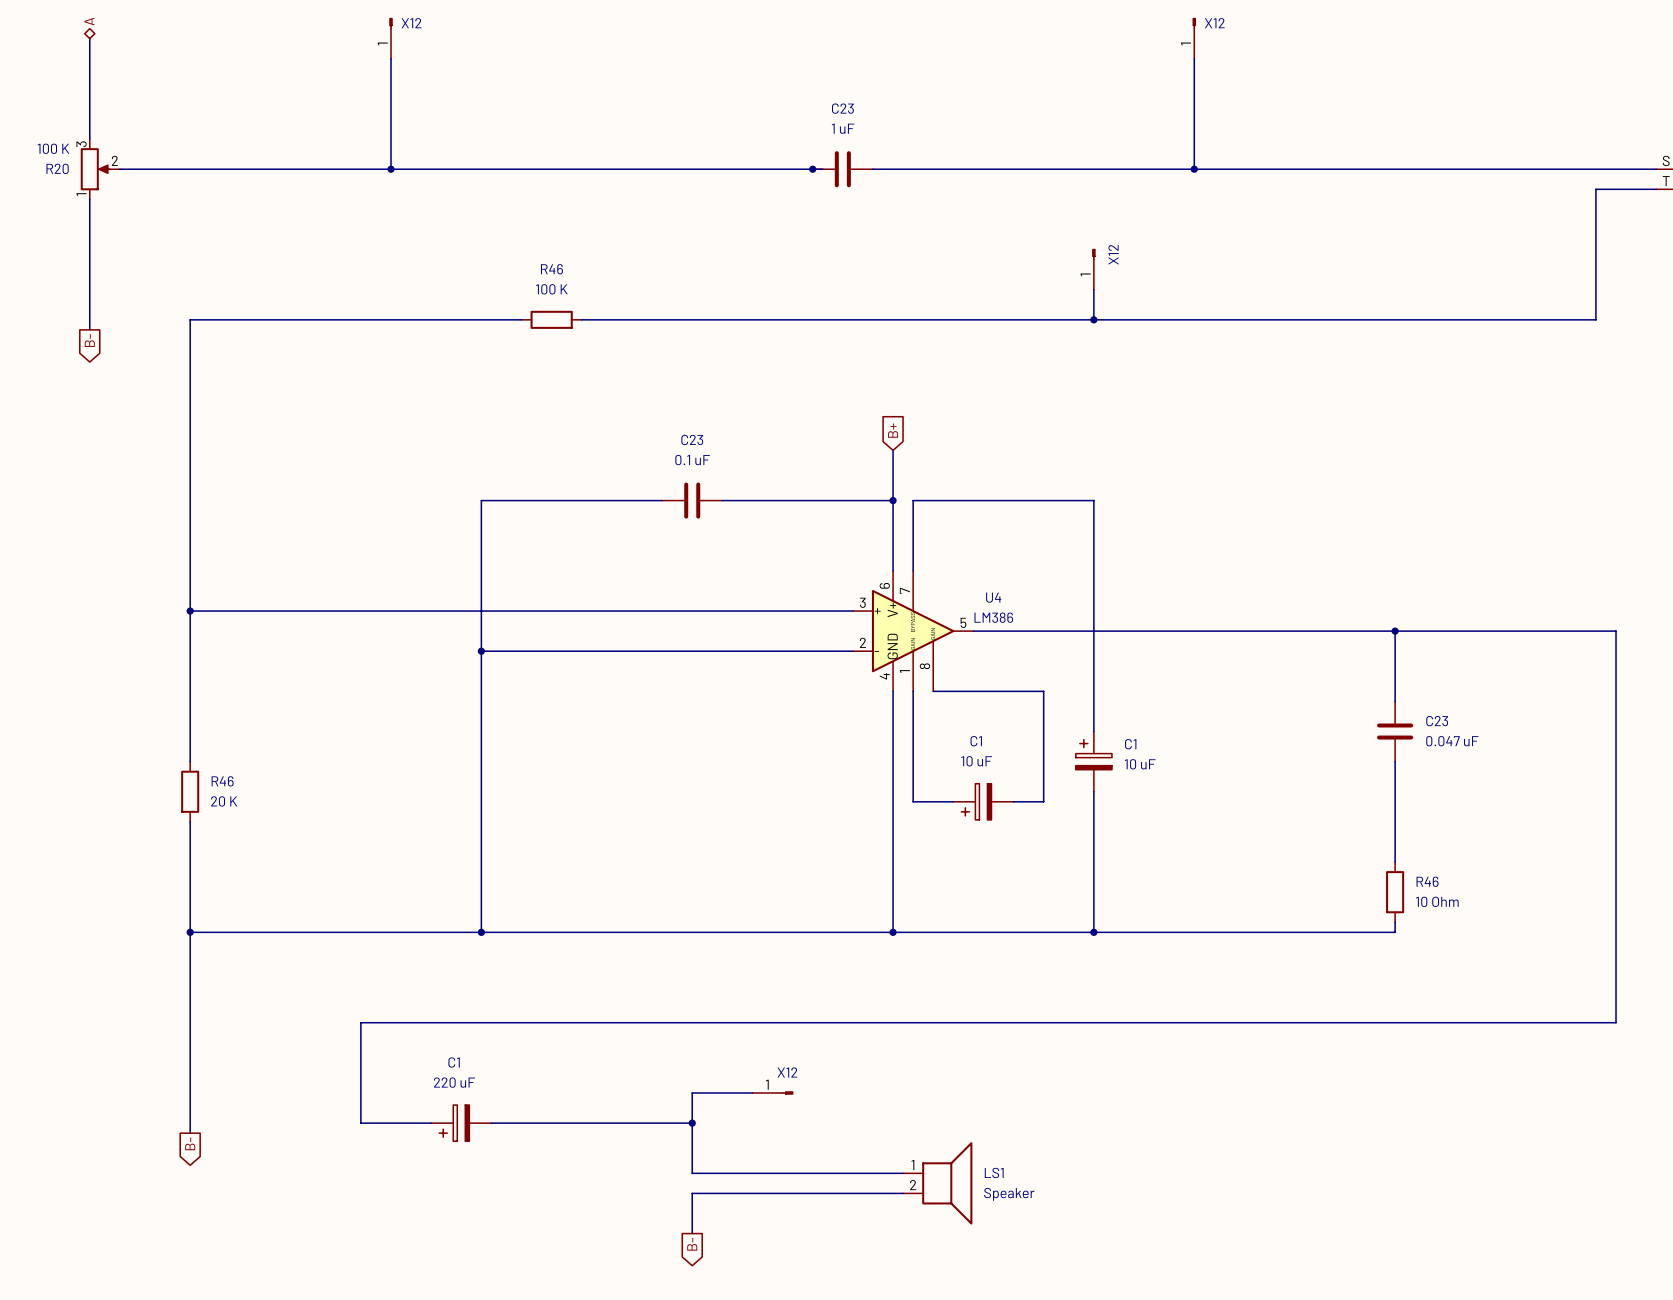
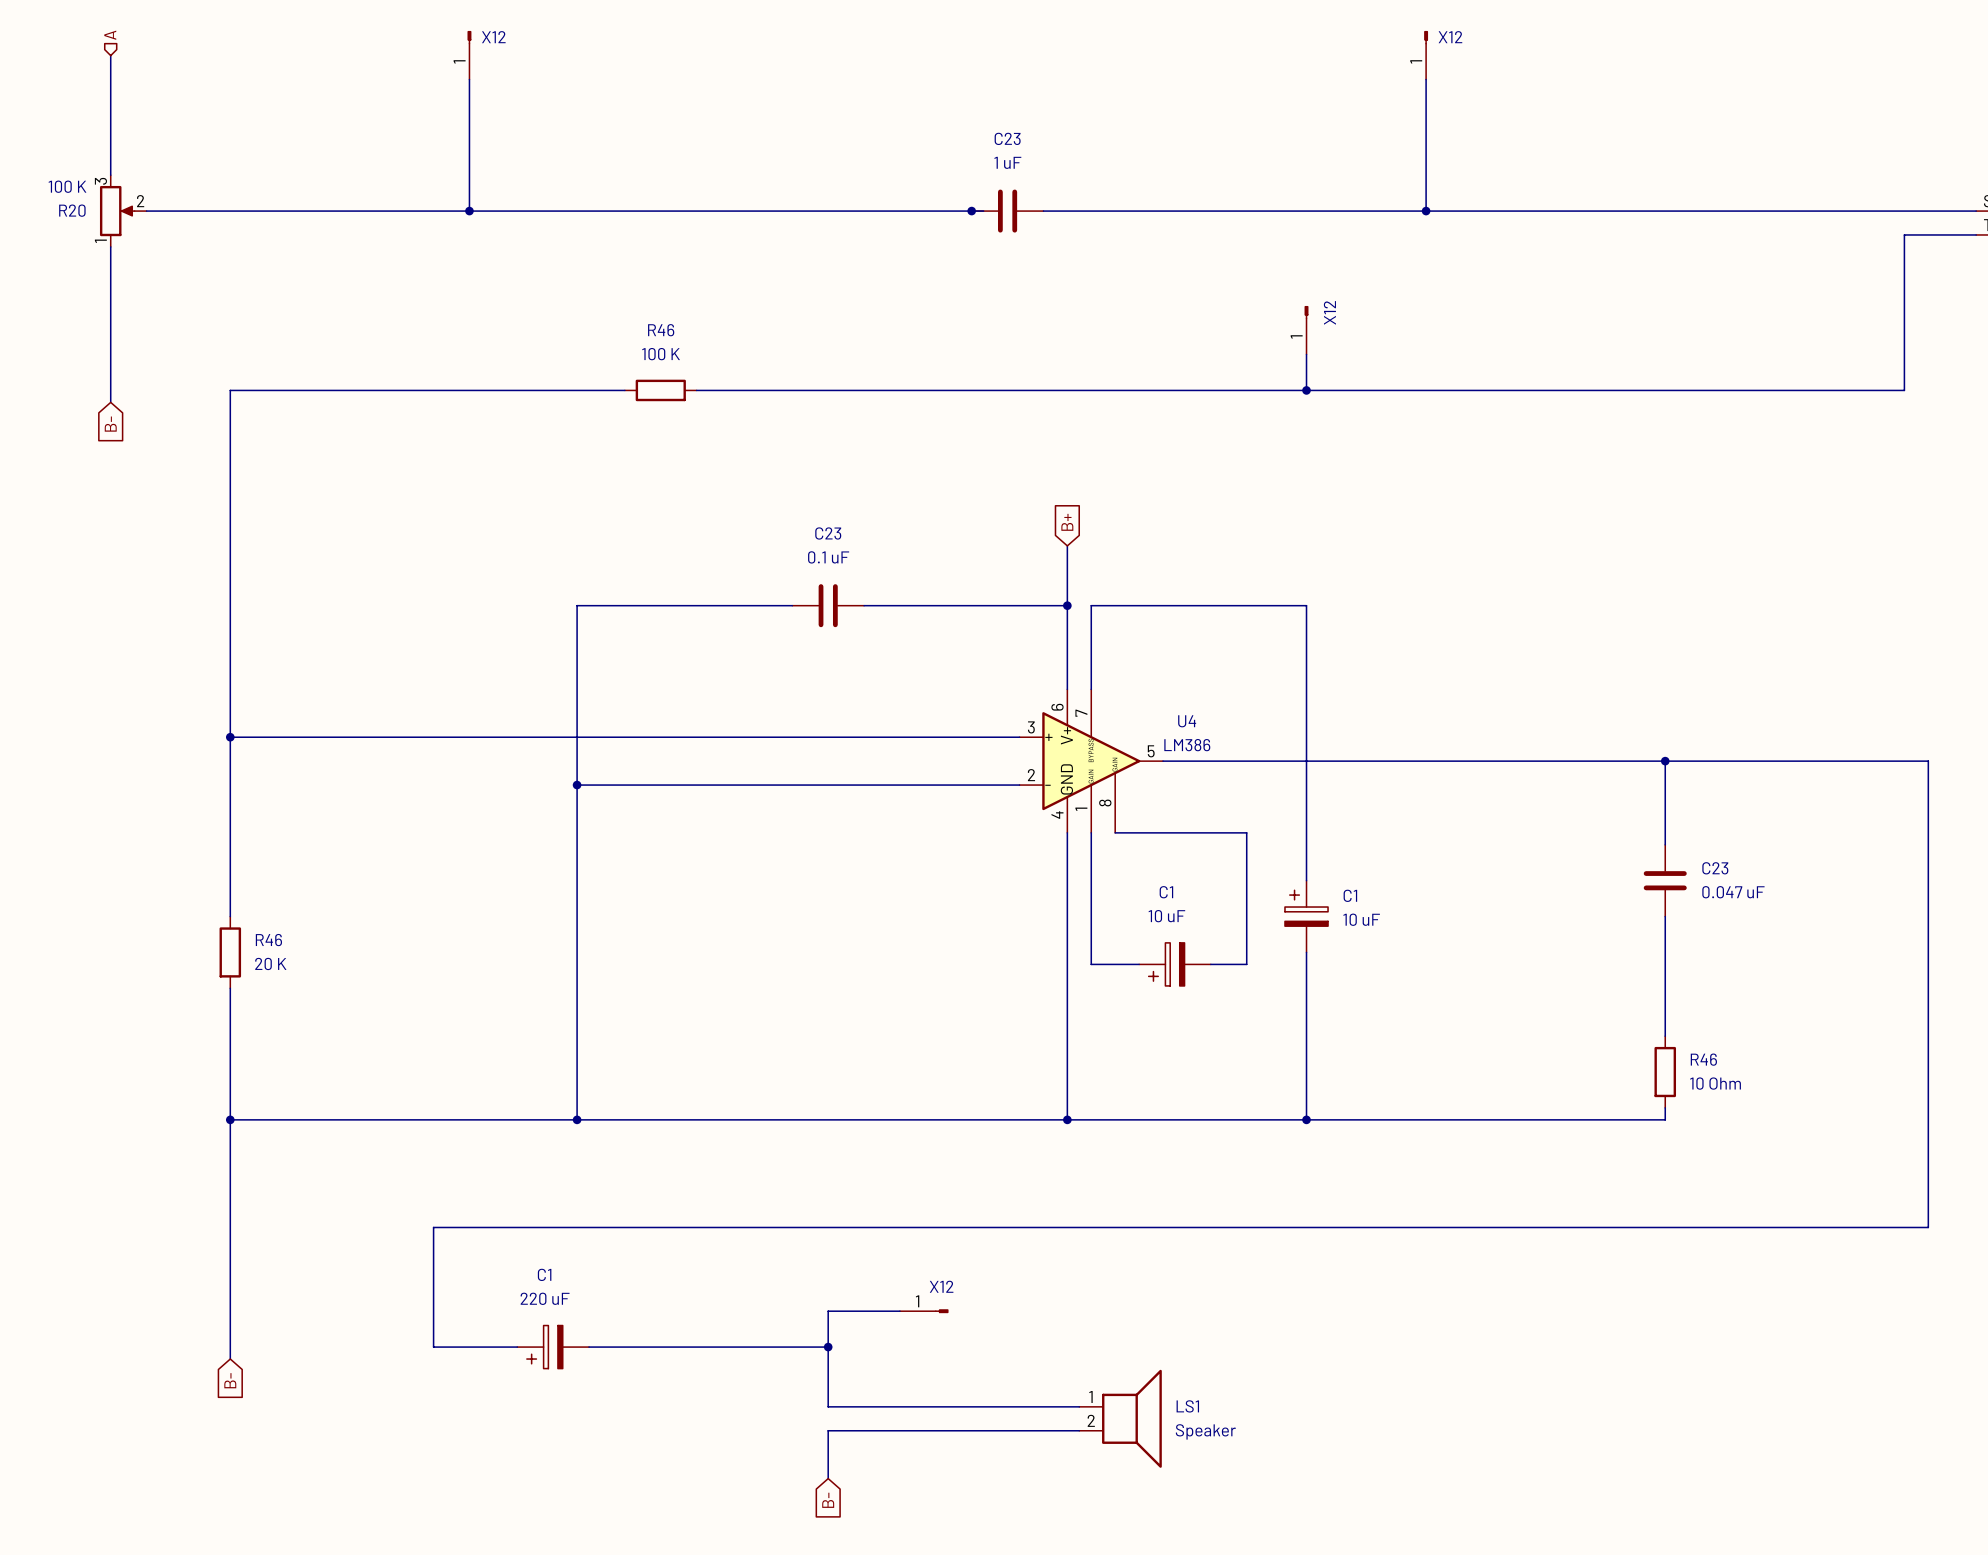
hierarchical label shape: bidirectional (89, 21) -> input (110, 35)
global label shape: output (89, 340) -> input (110, 424)
global label shape: output (190, 1143) -> input (230, 1380)
global label shape: output (692, 1244) -> input (828, 1500)

